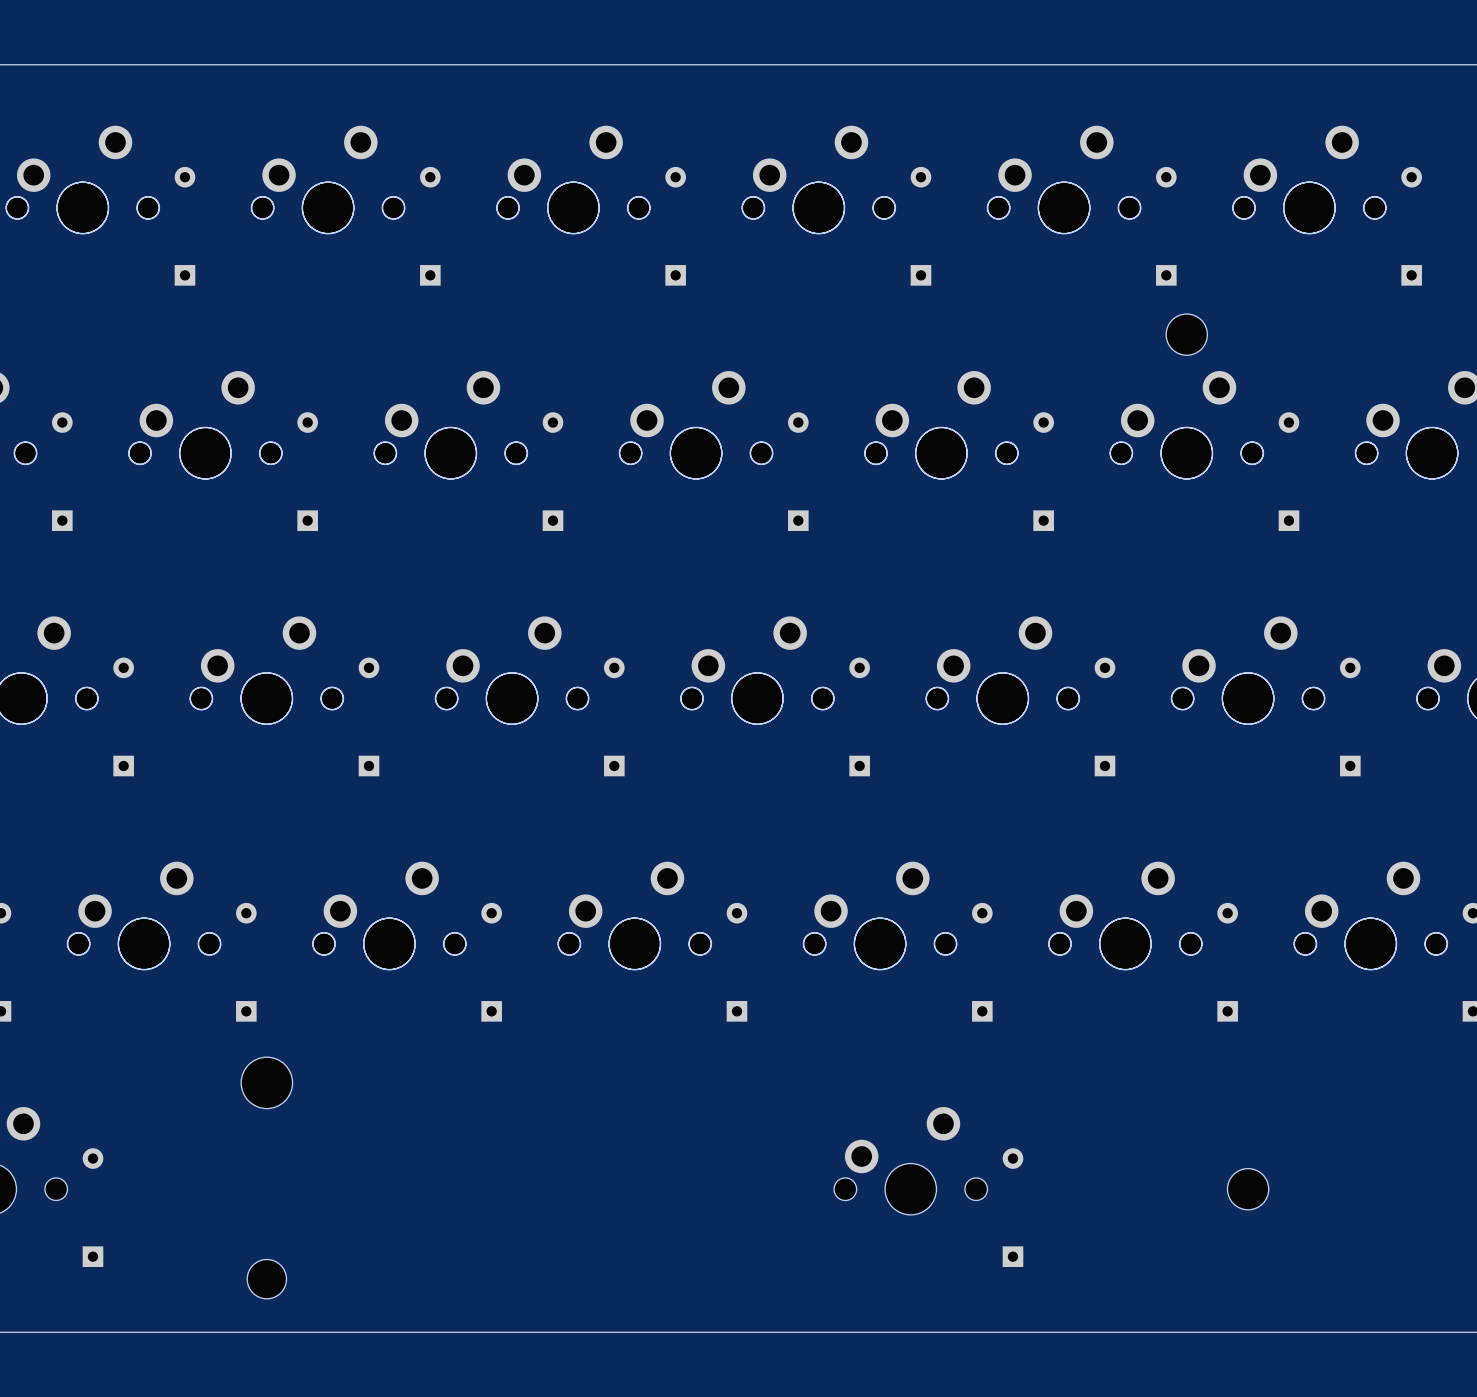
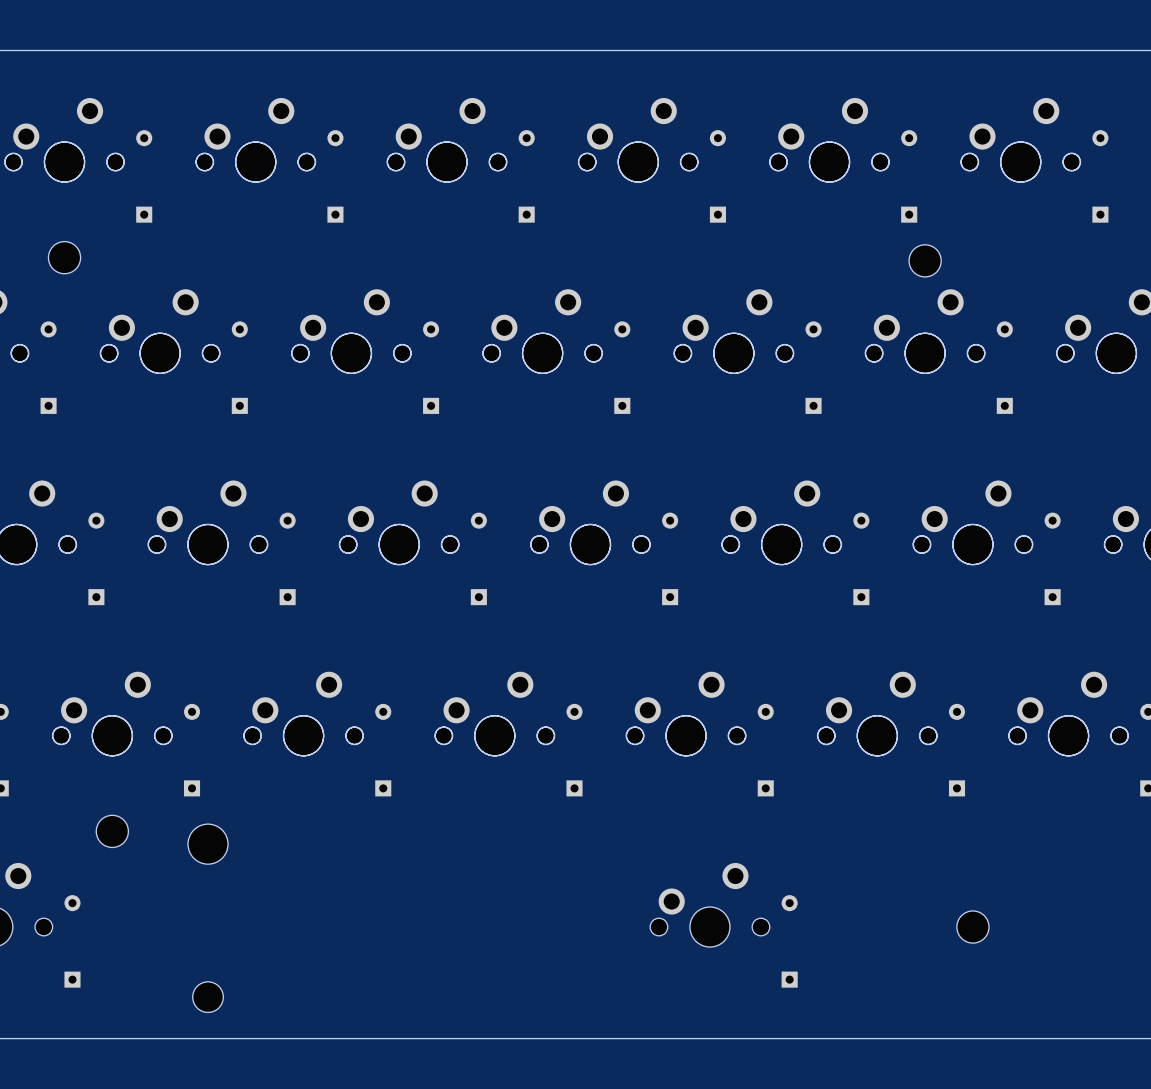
part: none -> (64, 257)
part: none -> (112, 831)

